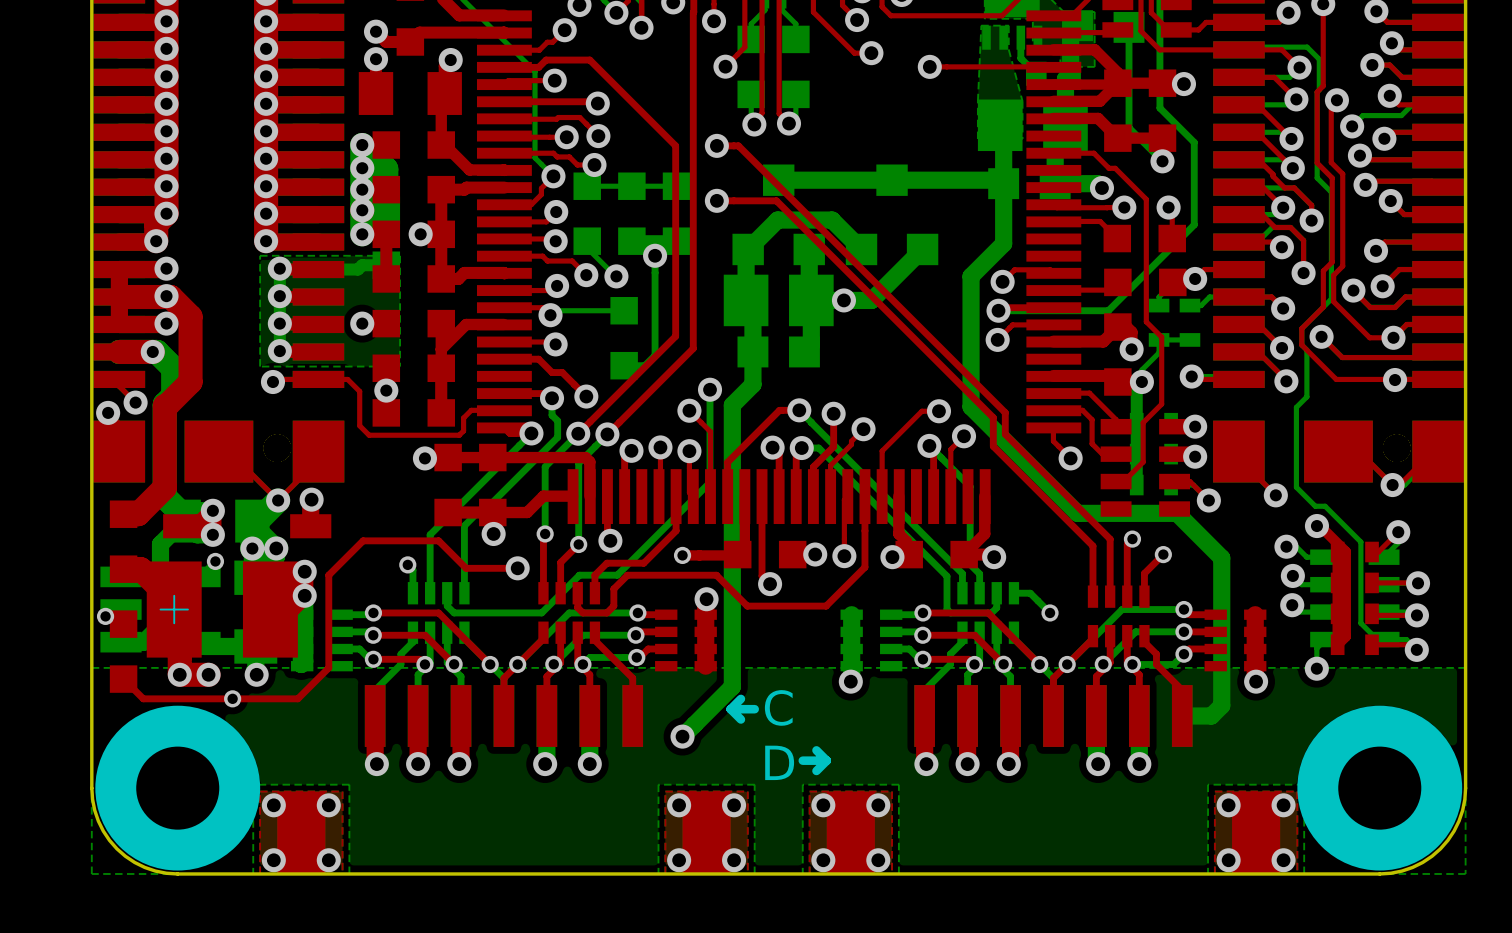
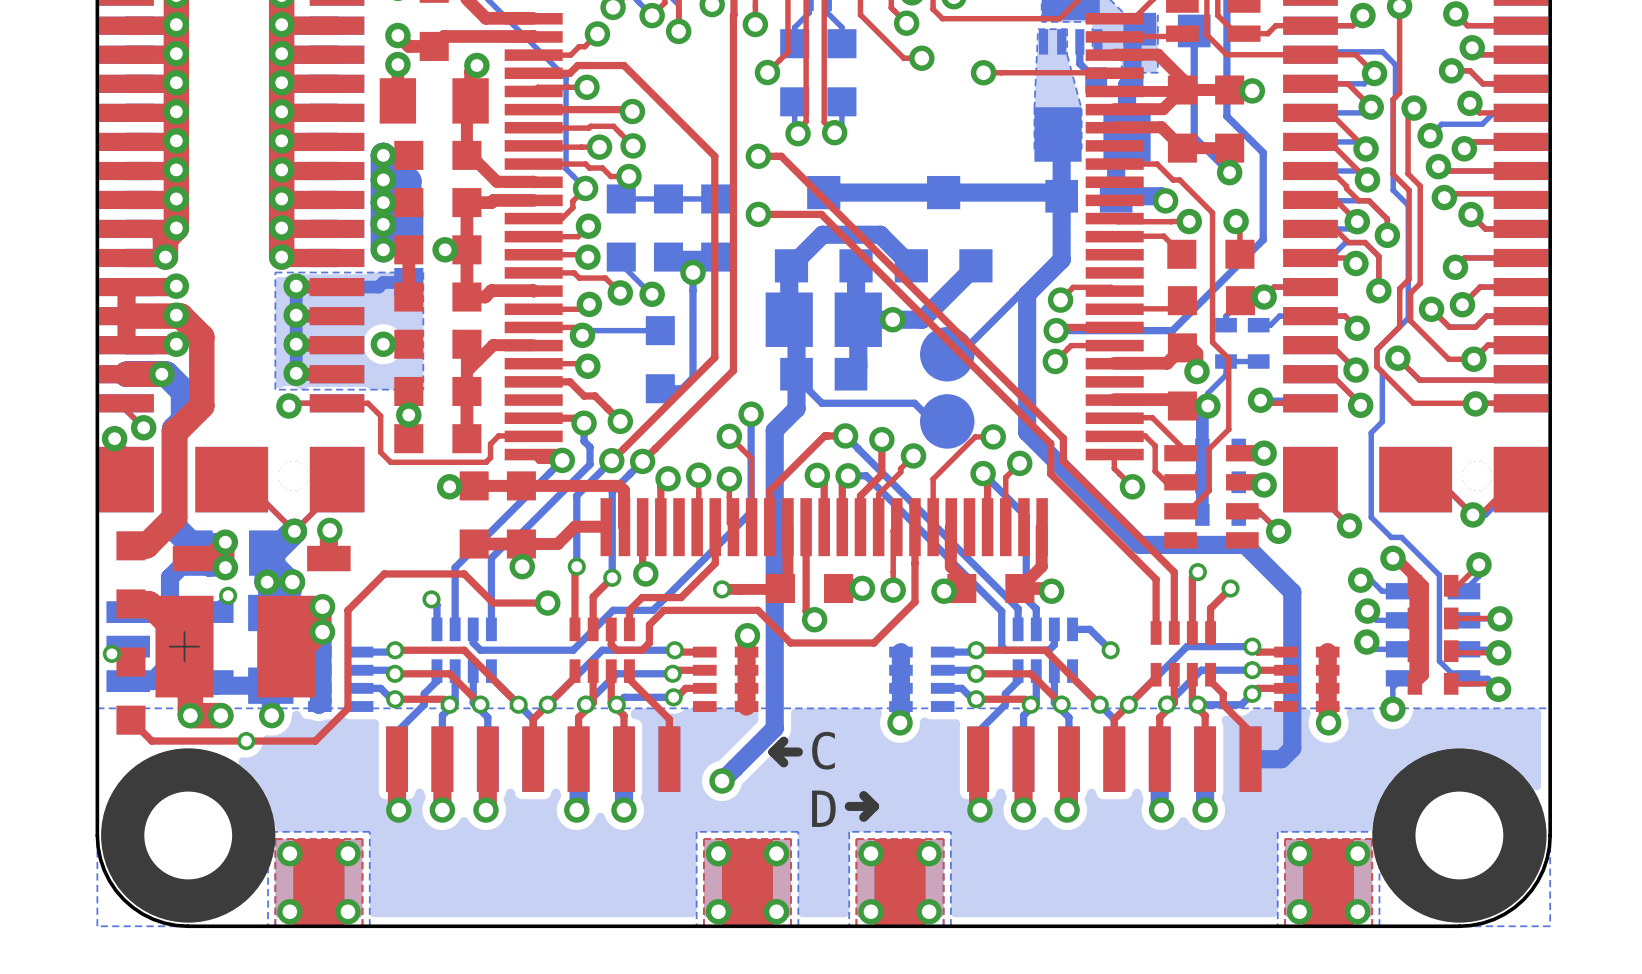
bottom track: none -> (1027, 294) (1019, 294) (959, 354) (947, 354)
part: none -> (947, 354)
bottom track: none -> (796, 377) (821, 403) (914, 403) (932, 421) (947, 421)
part: none -> (947, 421)

